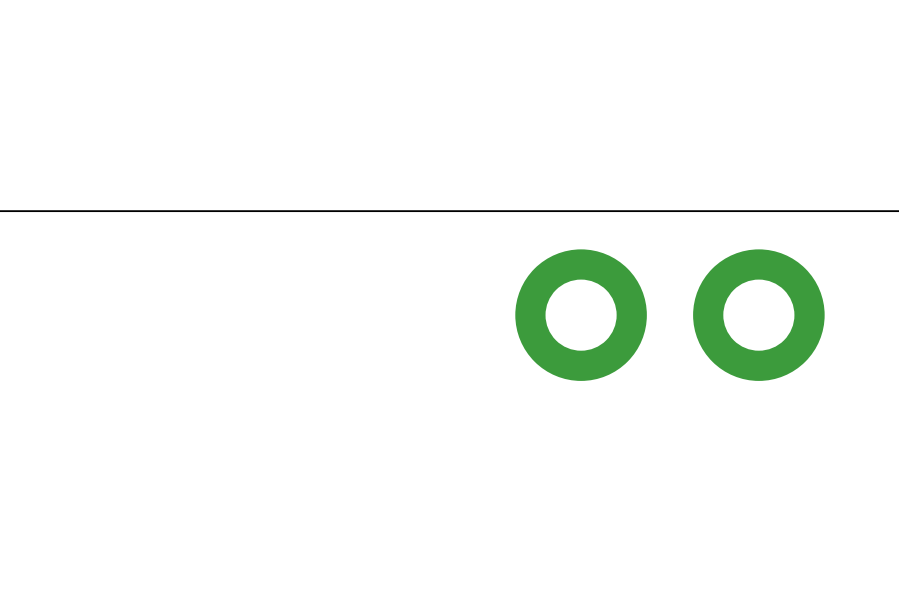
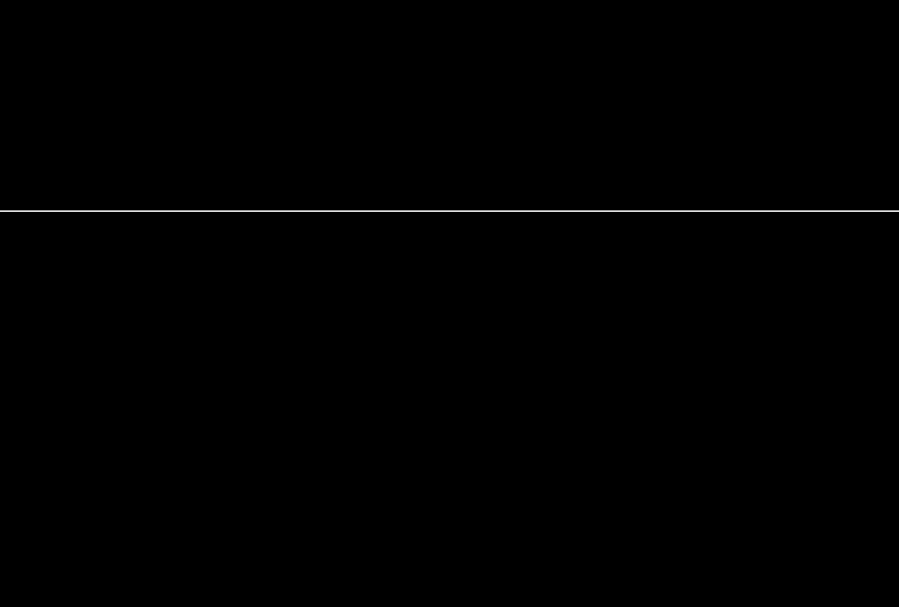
part: (669, 315) -> none

